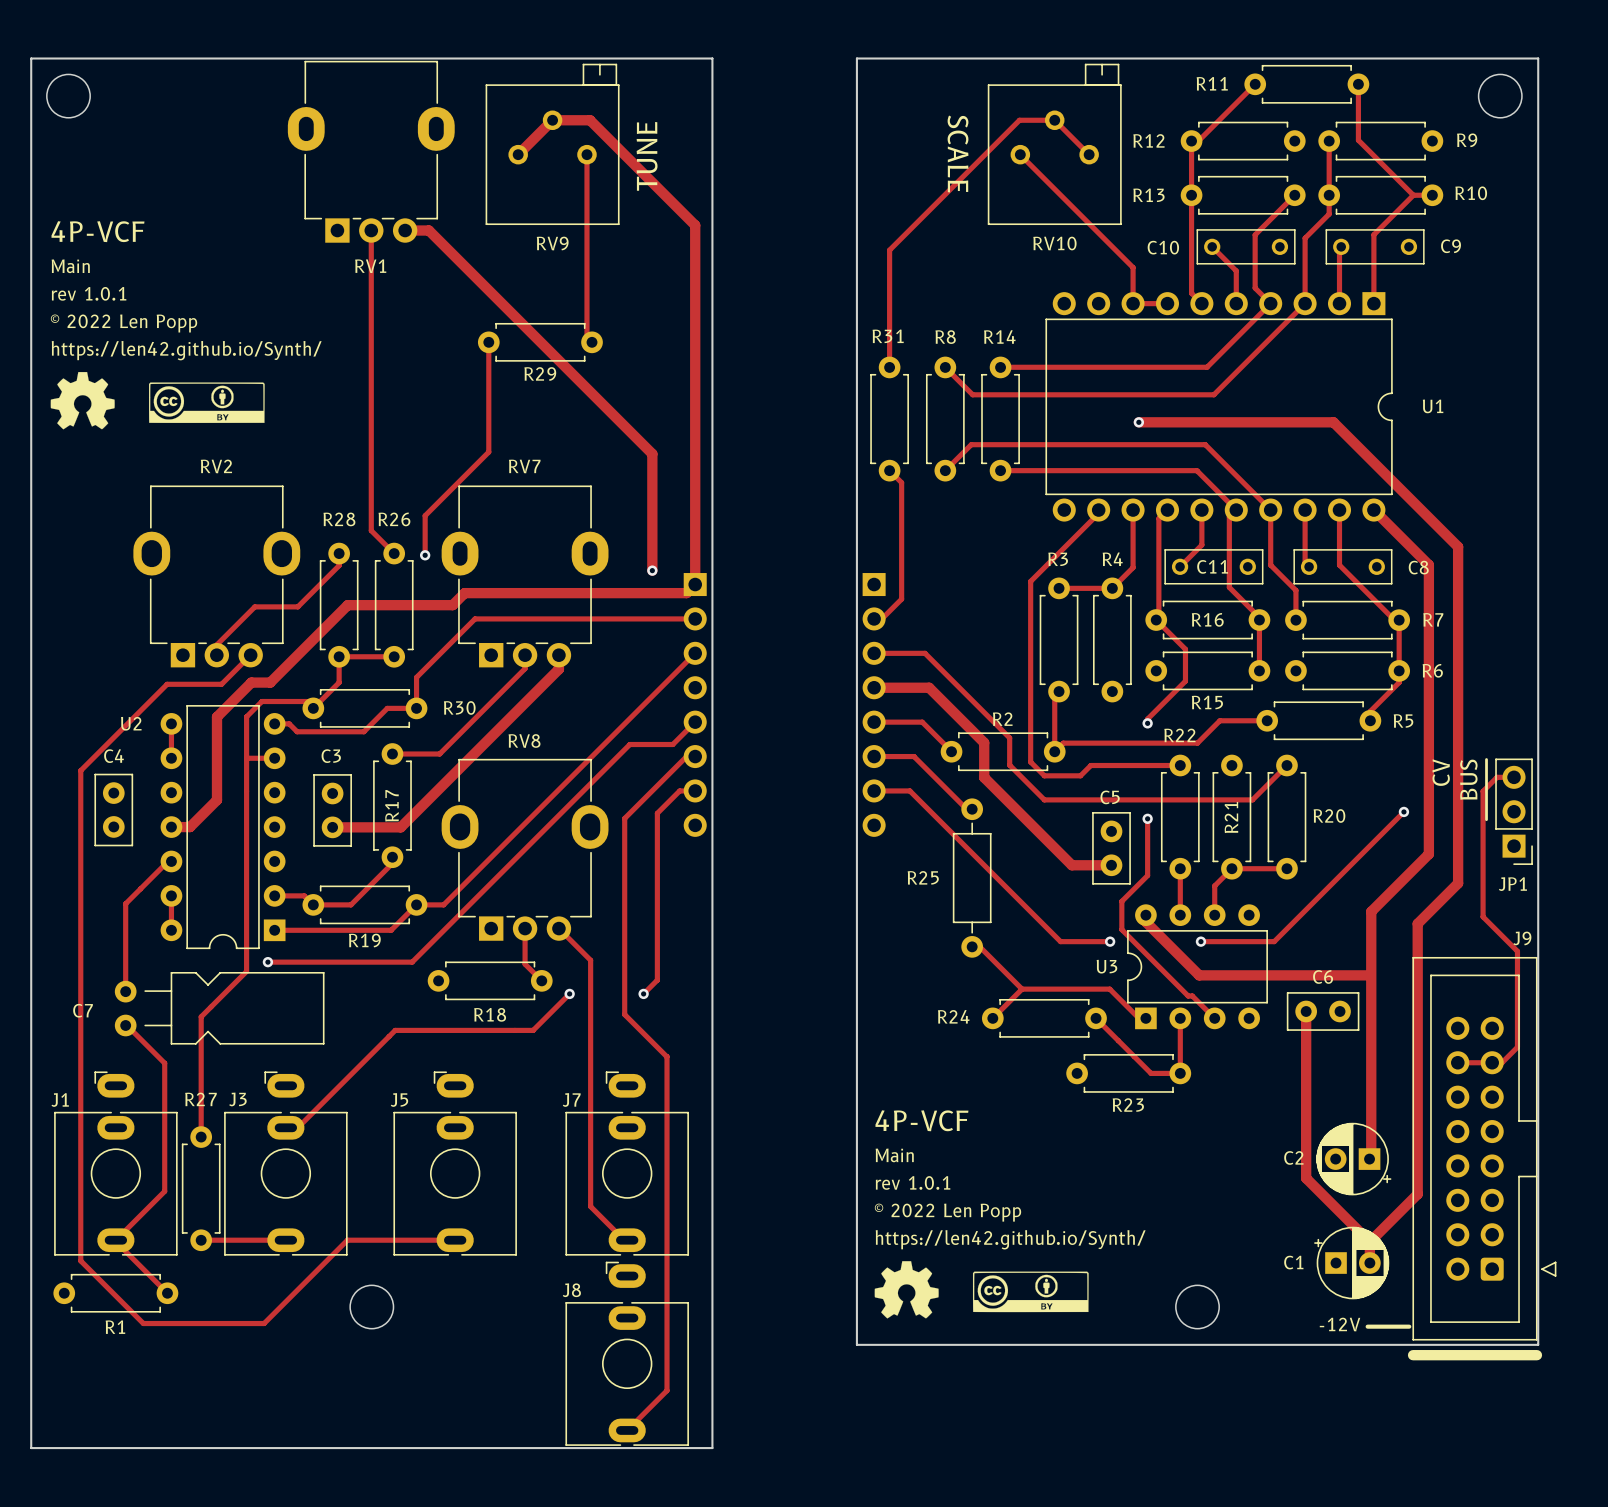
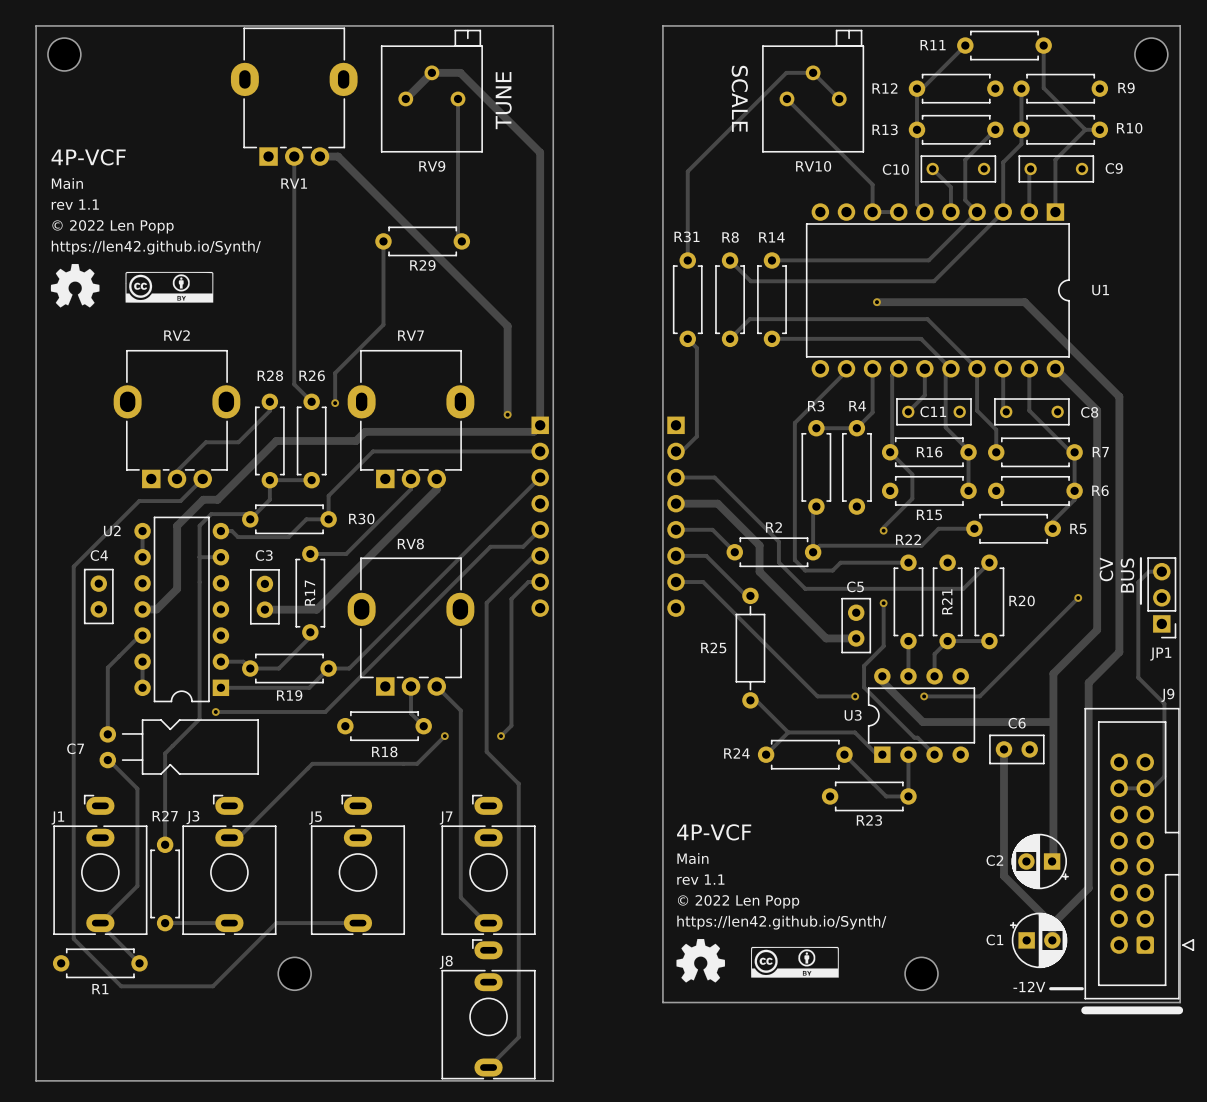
text: rev 1.0.1 (89, 293) -> rev 1.1 (75, 204)
text: rev 1.0.1 (913, 1182) -> rev 1.1 (700, 879)

